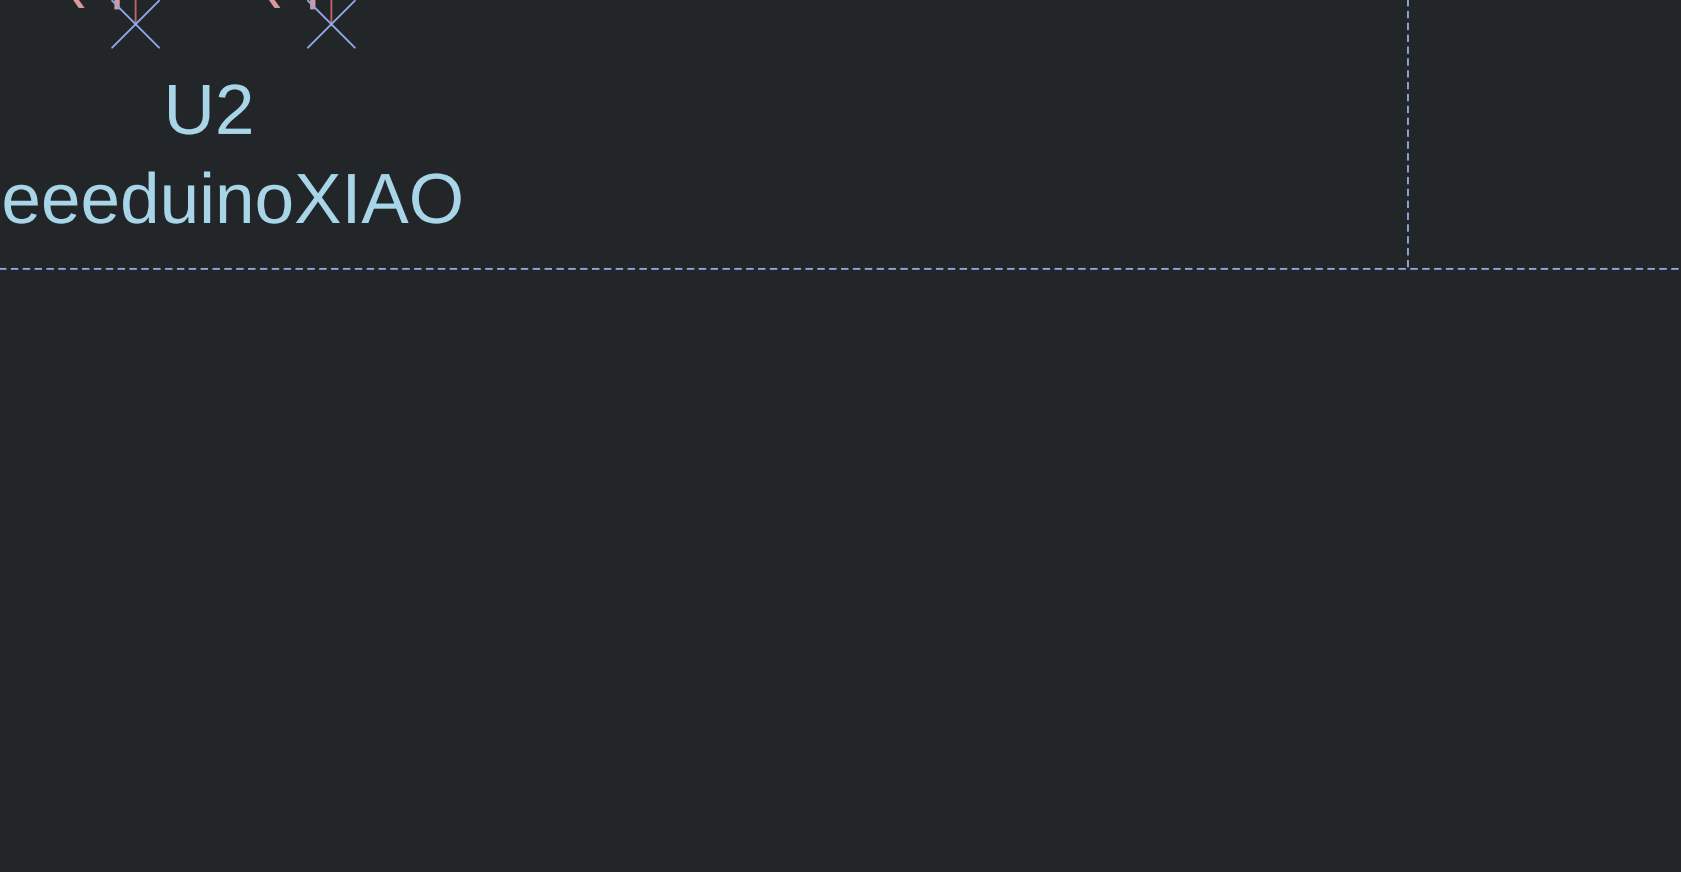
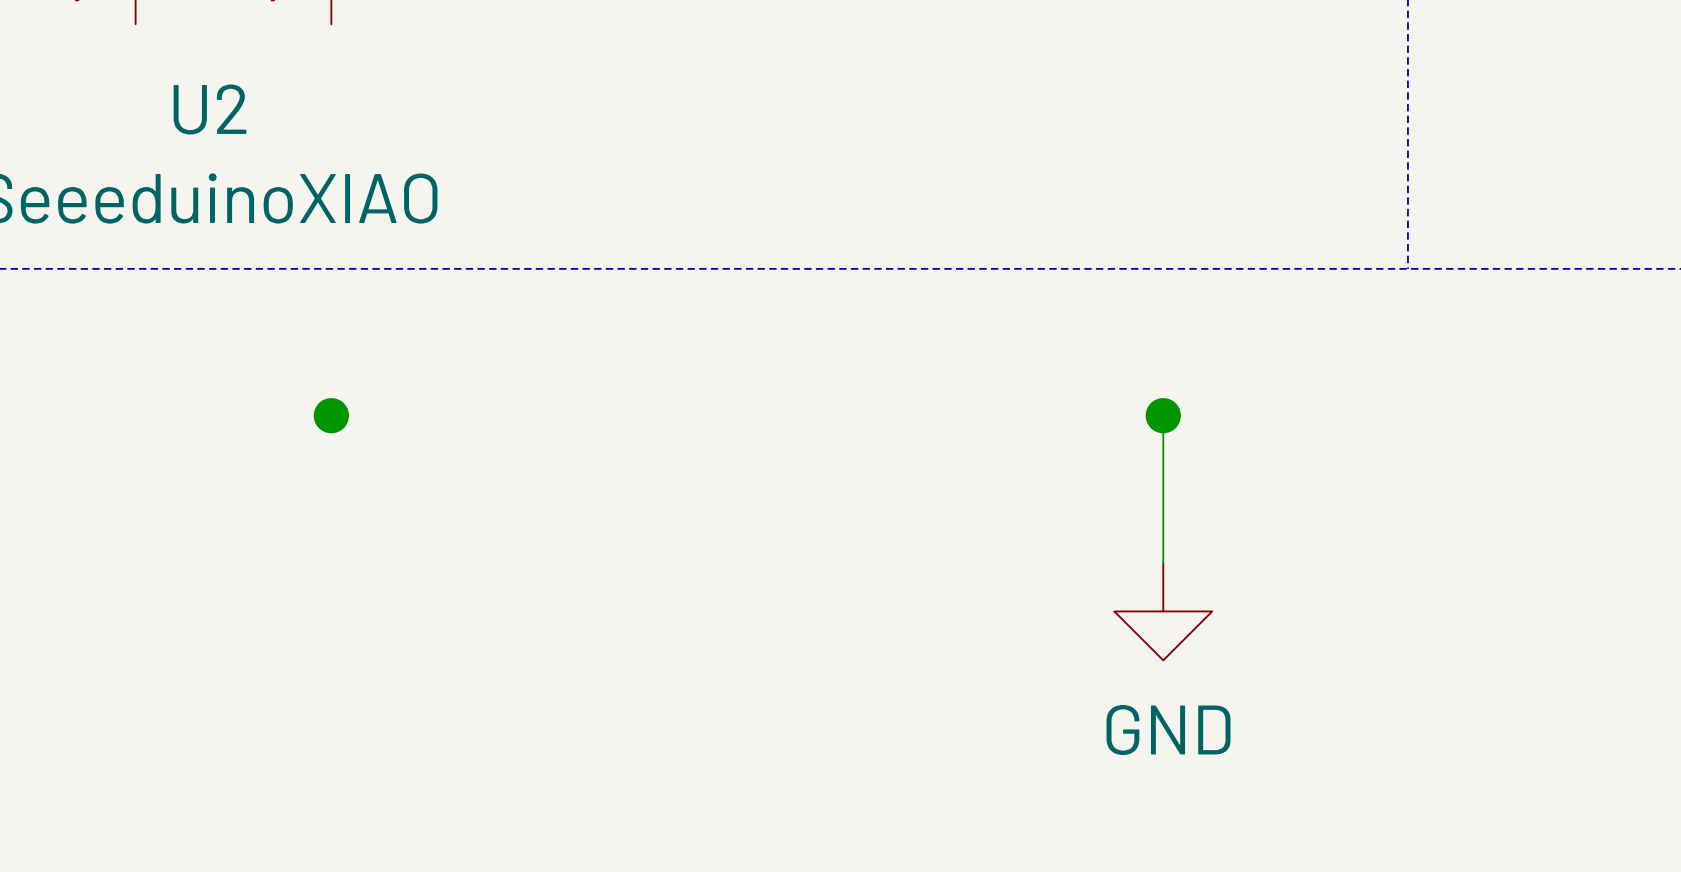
no-connect mark: (135, 24) -> none
no-connect mark: (331, 24) -> none
junction: none -> (331, 415)
wire: none -> (1163, 415) (1163, 562)
junction: none -> (1163, 415)
power symbol: none -> GND (1163, 611)

